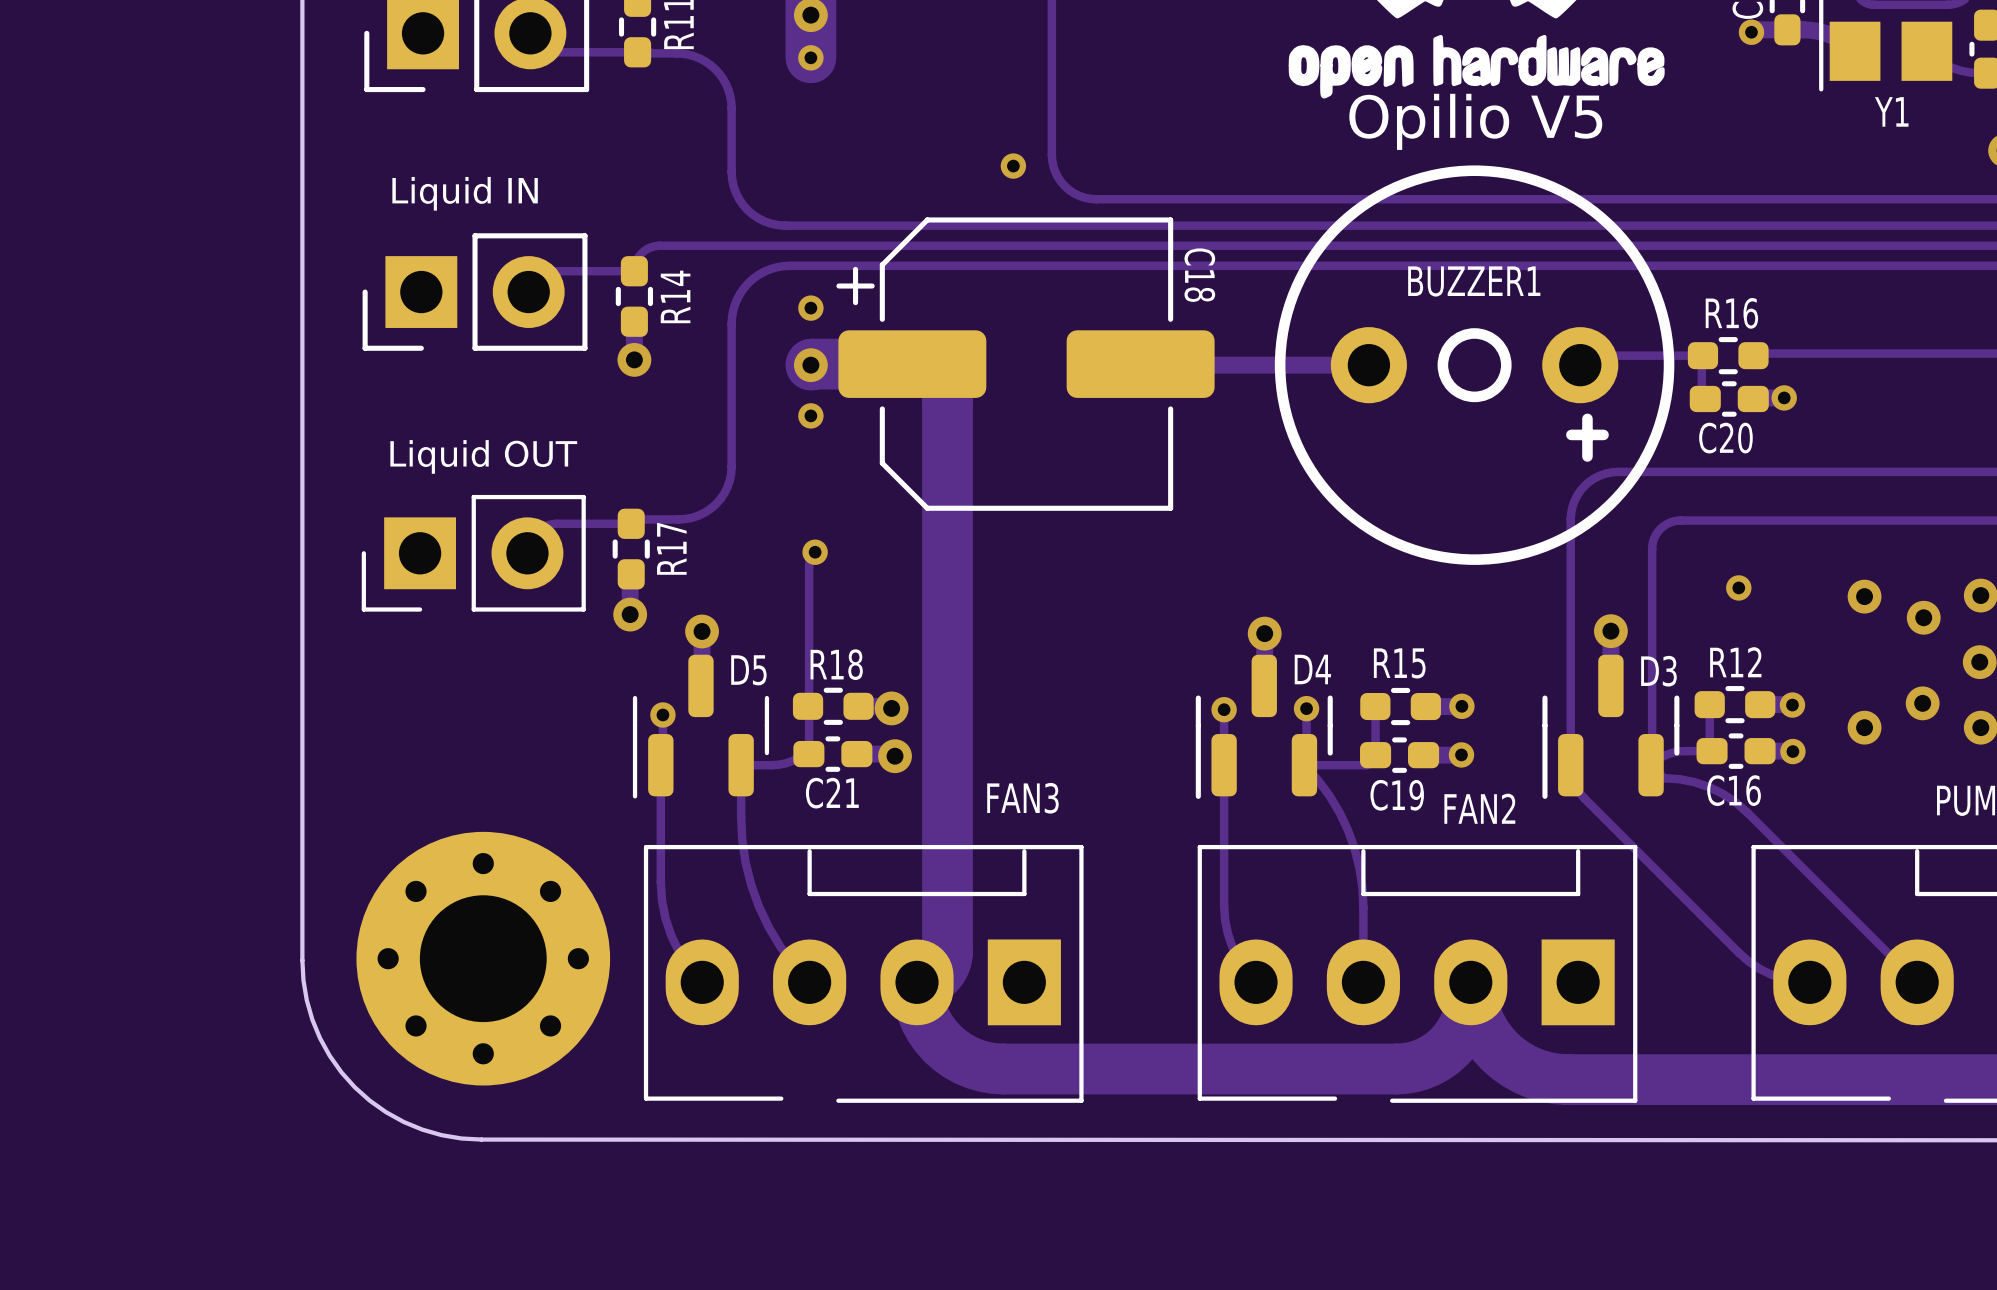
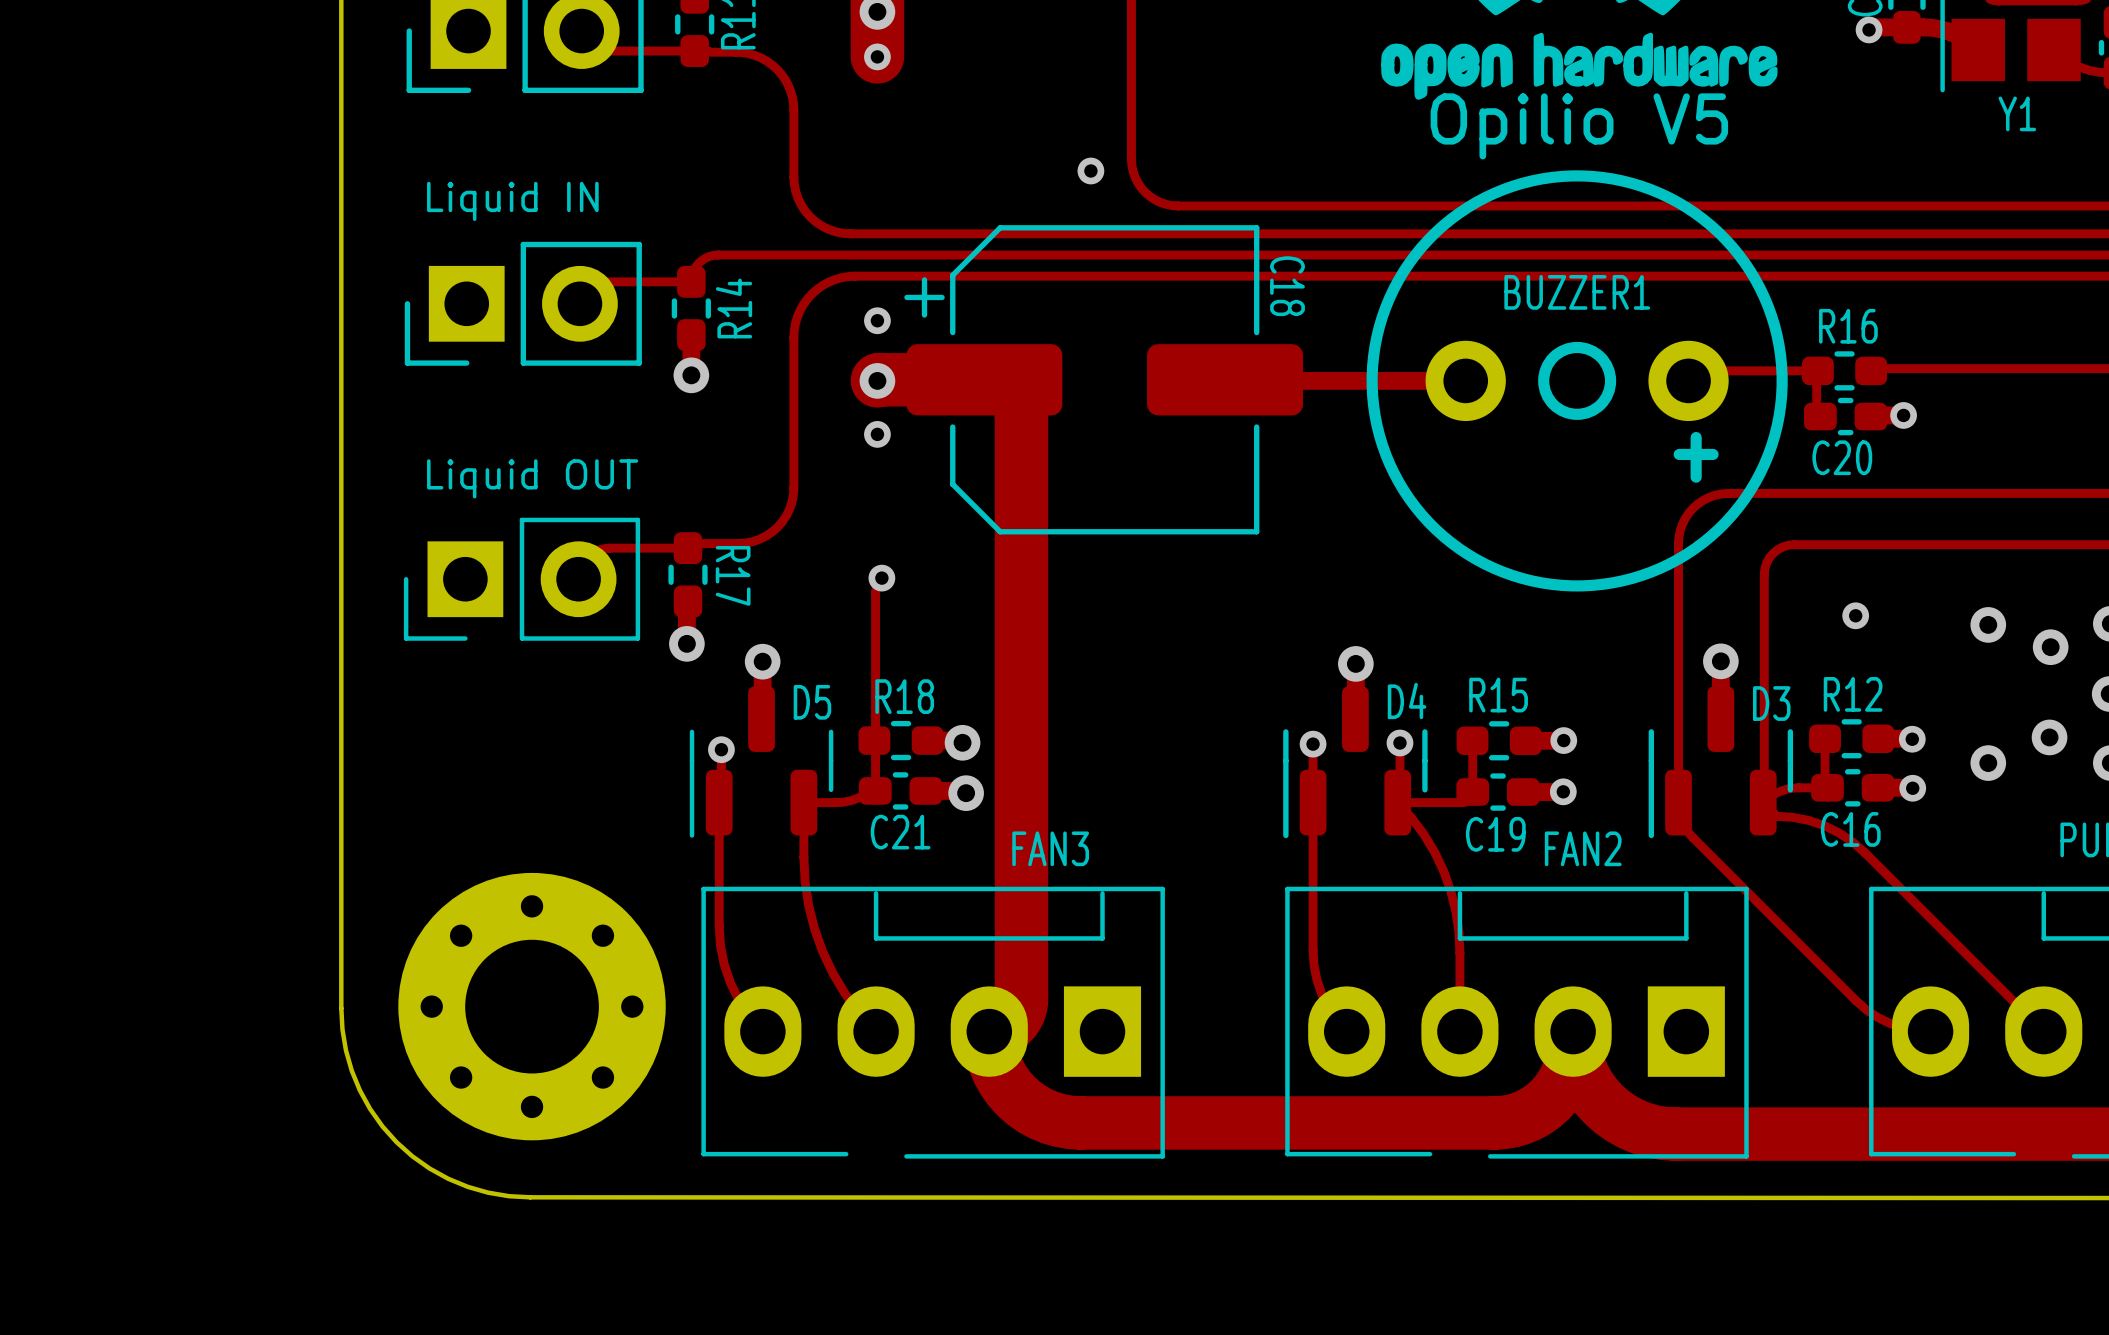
R17 name rotation: 0° (671, 548) -> 180° (733, 575)
FAN3 name position: FAN3 (1022, 798) -> FAN3 (1050, 848)

